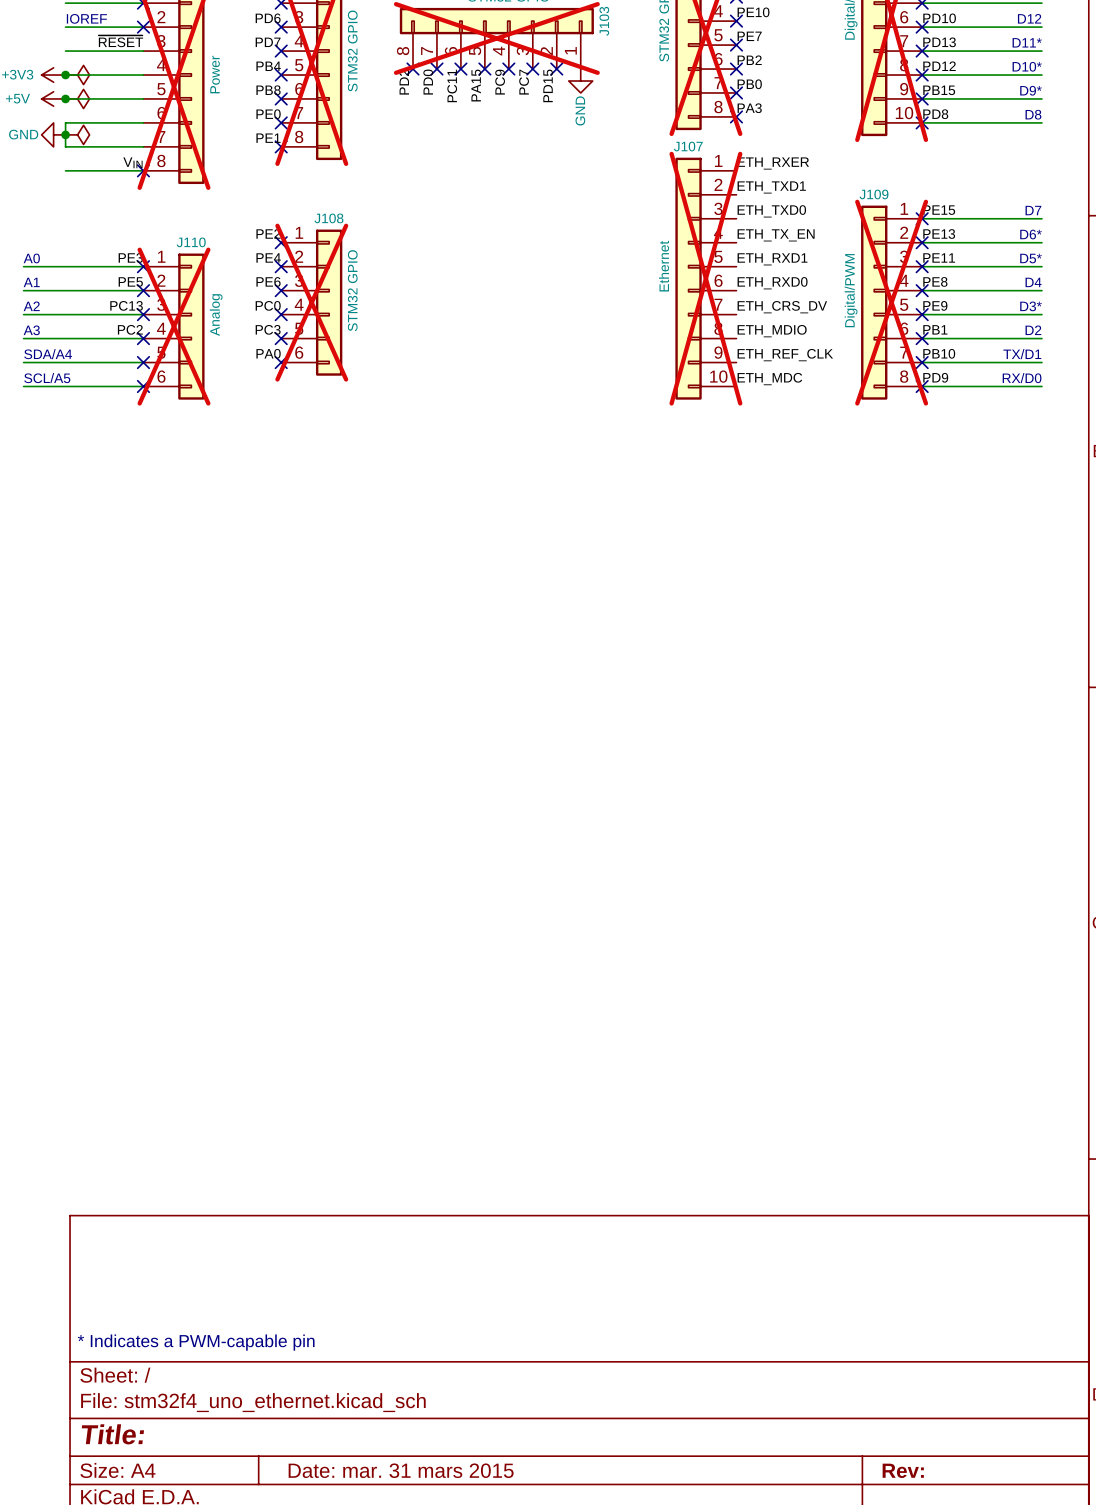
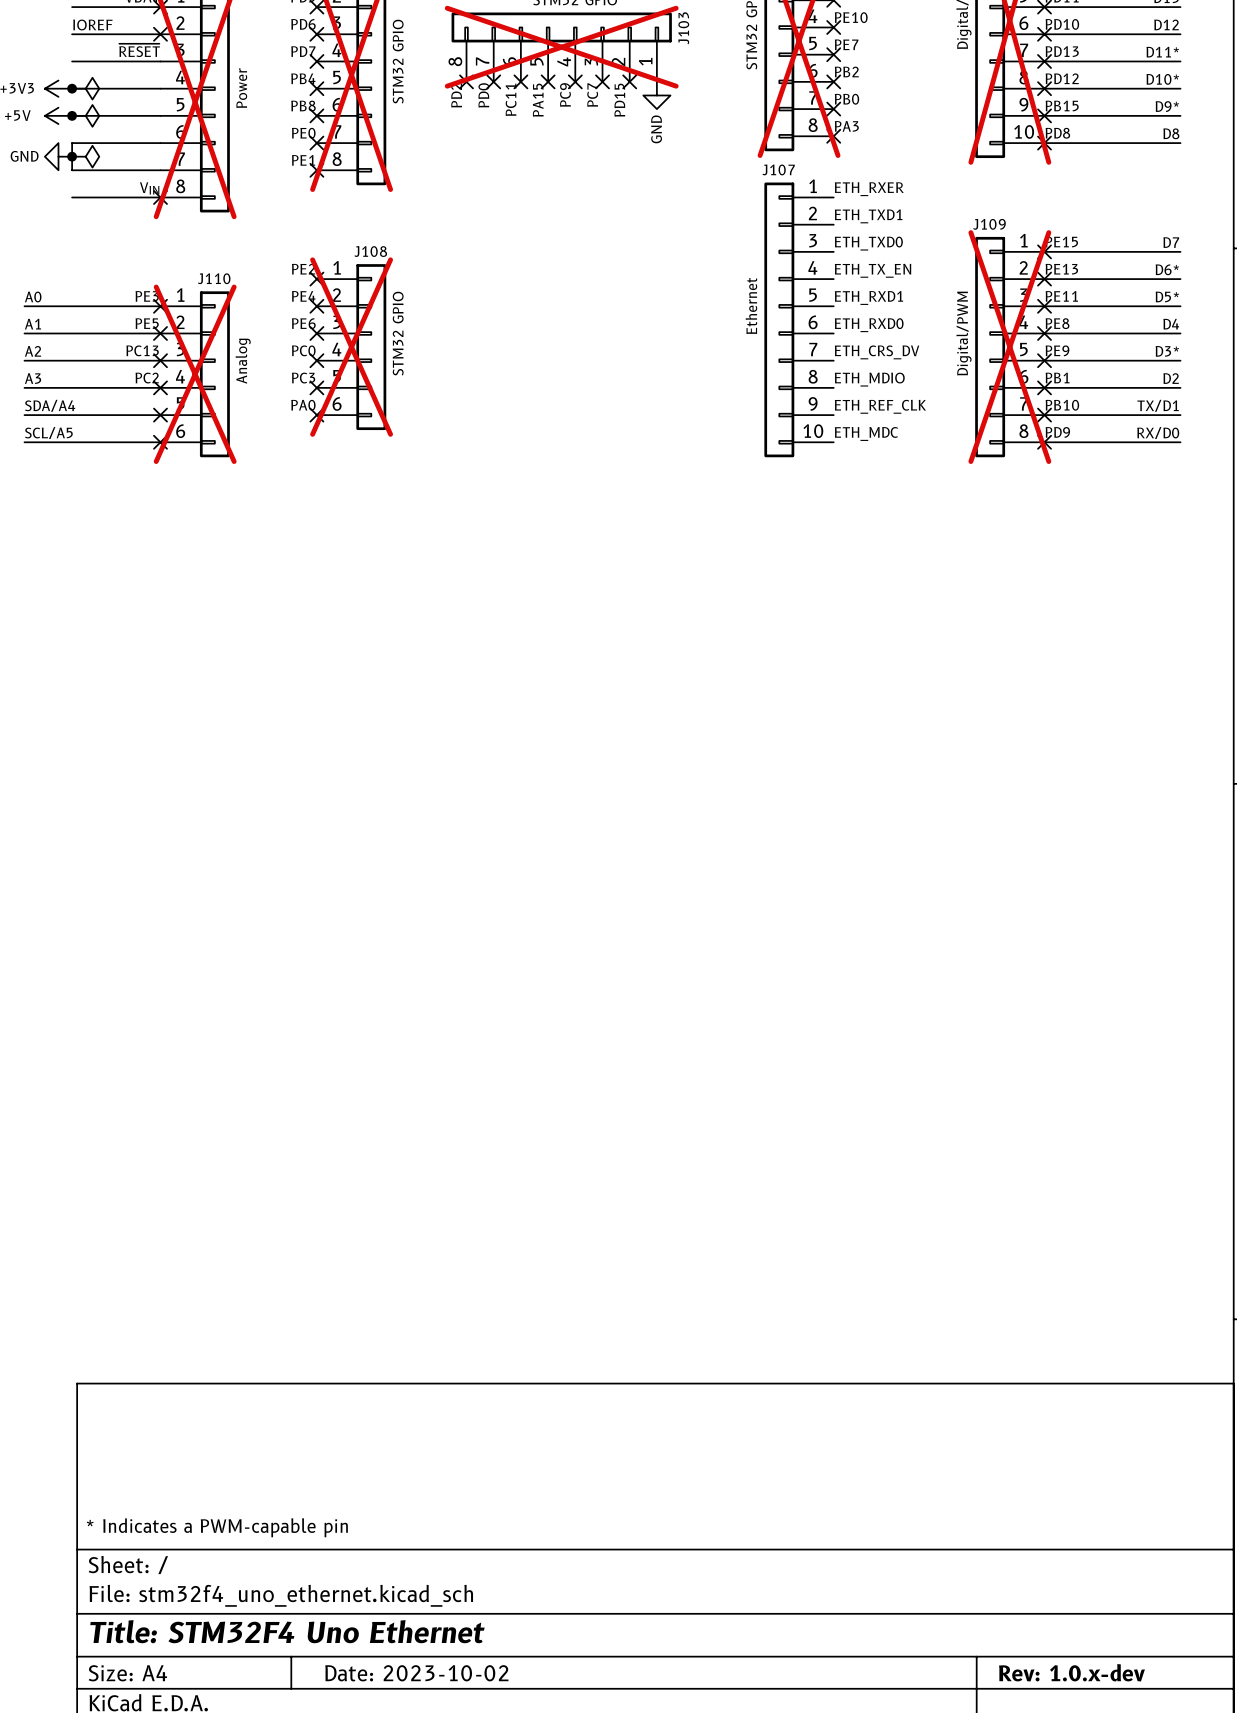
J107 do-not-place cross: (705, 278) -> none
title block: Title: (112, 1434) -> Title: STM32F4 Uno Ethernet (287, 1631)
title block: Date: mar. 31 mars 2015 (401, 1470) -> Date: 2023-10-02 (416, 1673)
title block: Rev: (903, 1470) -> Rev: 1.0.x-dev (1071, 1672)

